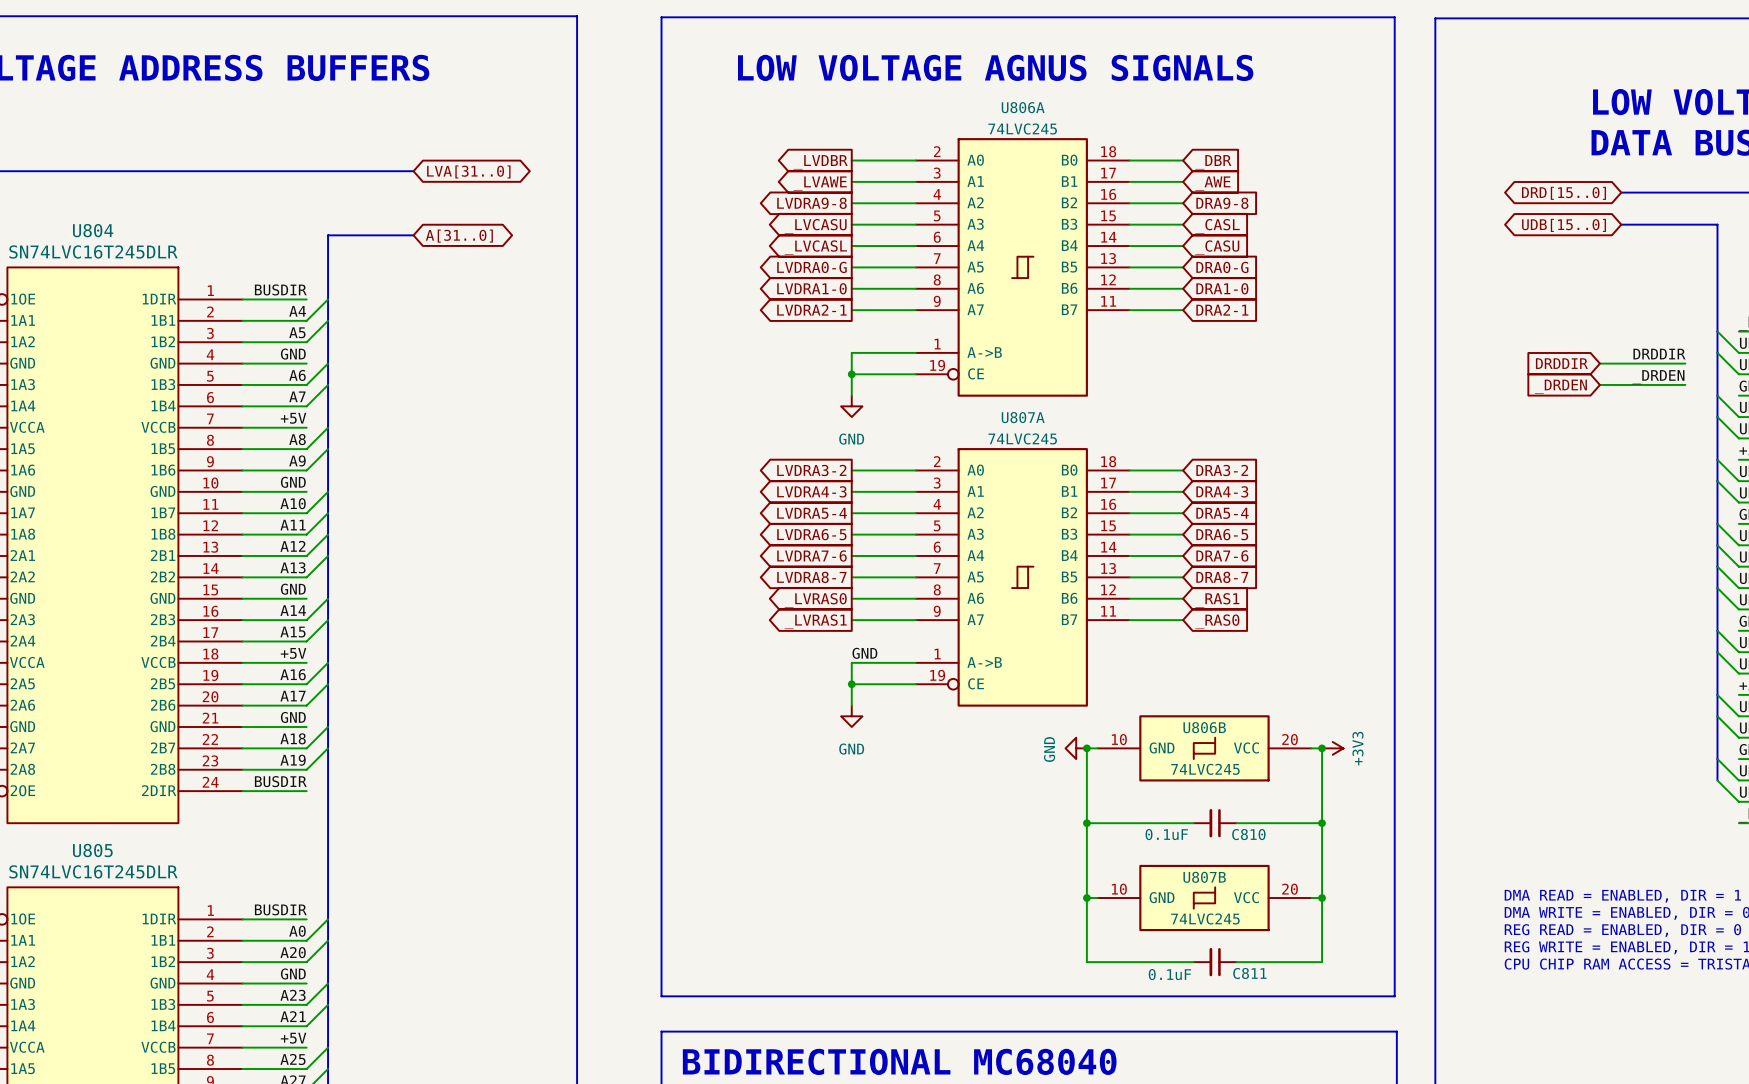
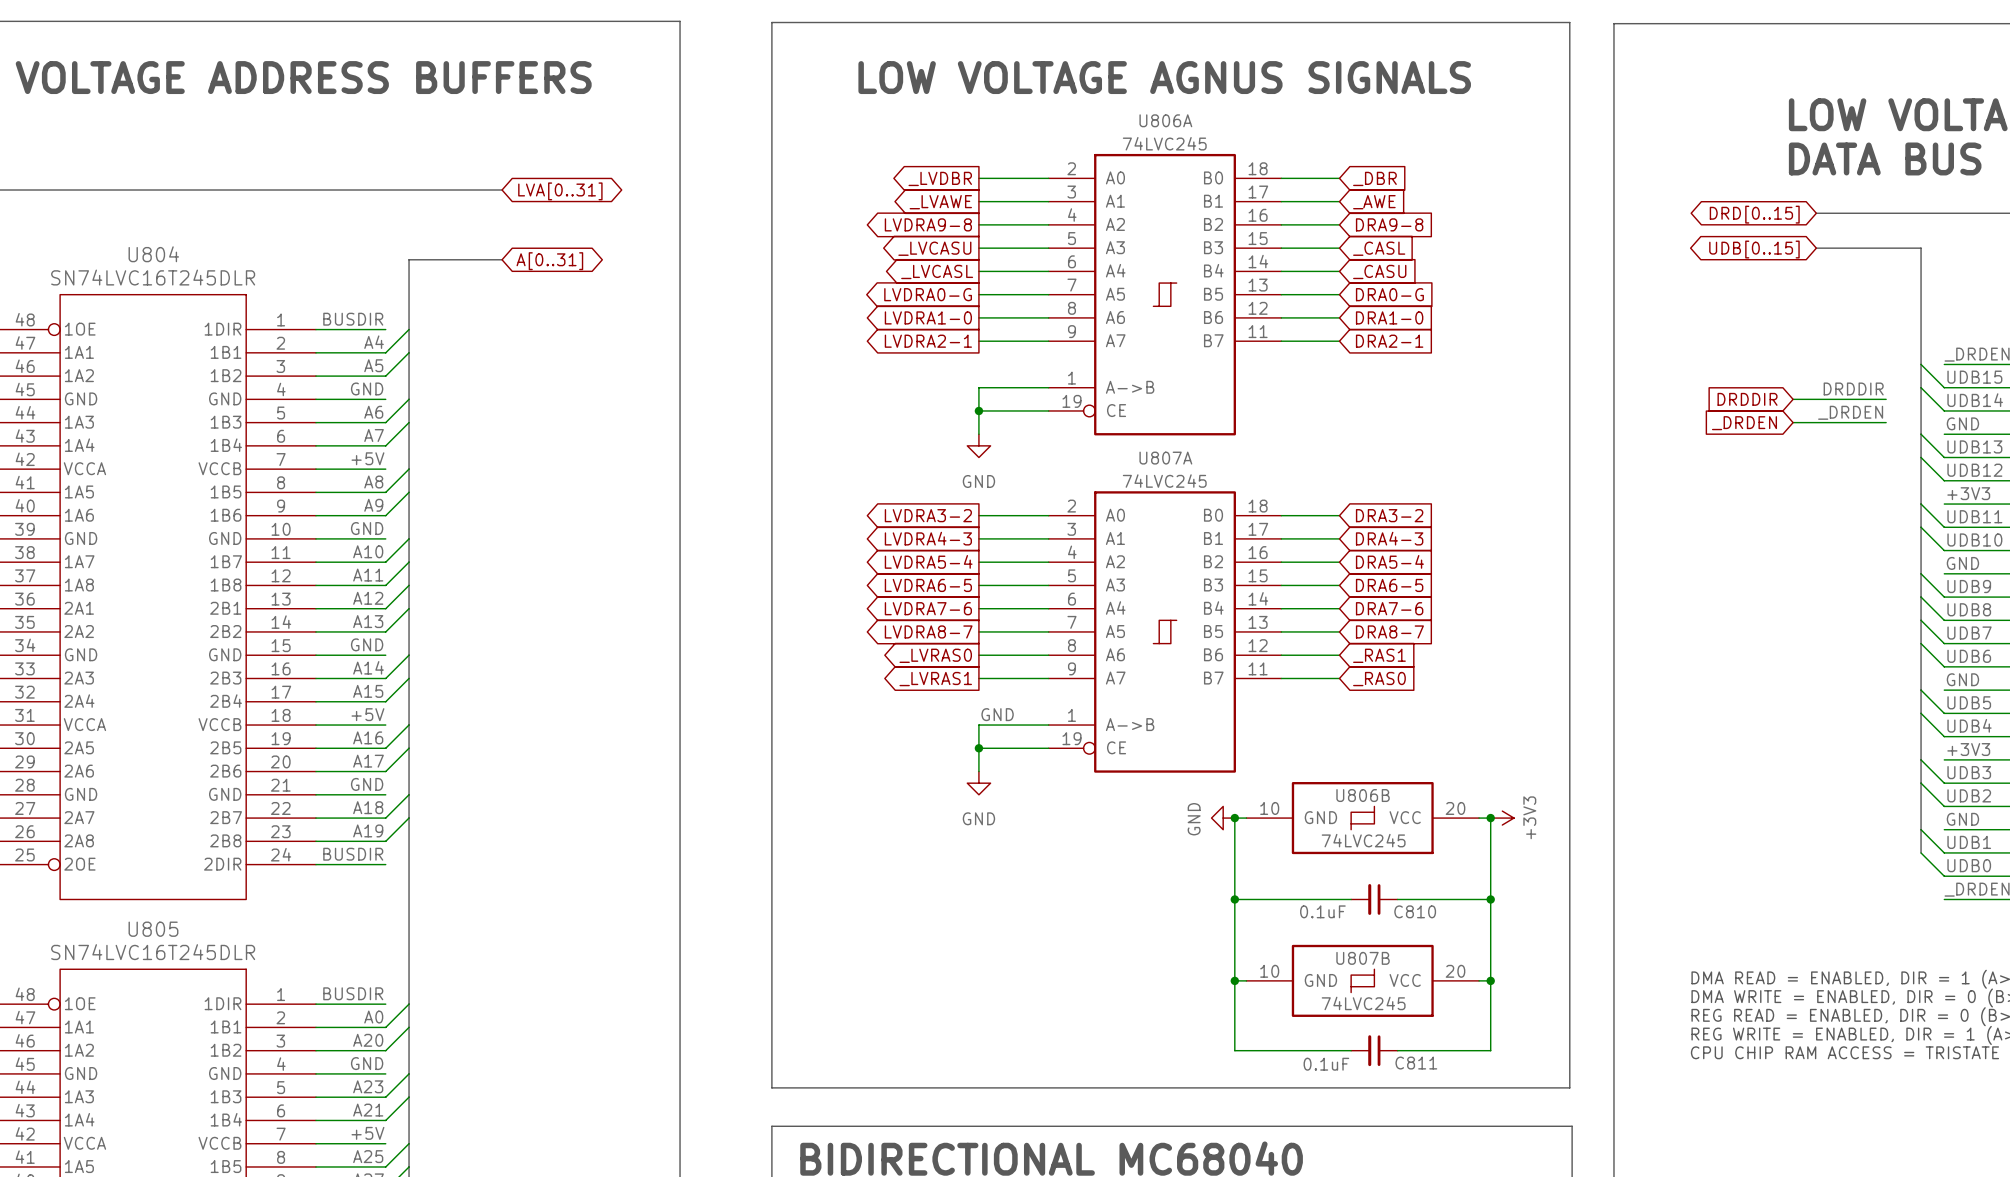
global label: LVA[31..0] (468, 171) -> LVA[0..31] (560, 191)
global label: DRD[15..0] (1563, 193) -> DRD[0..15] (1754, 214)
global label: UDB[15..0] (1564, 225) -> UDB[0..15] (1754, 249)
global label: A[31..0] (459, 236) -> A[0..31] (549, 261)

